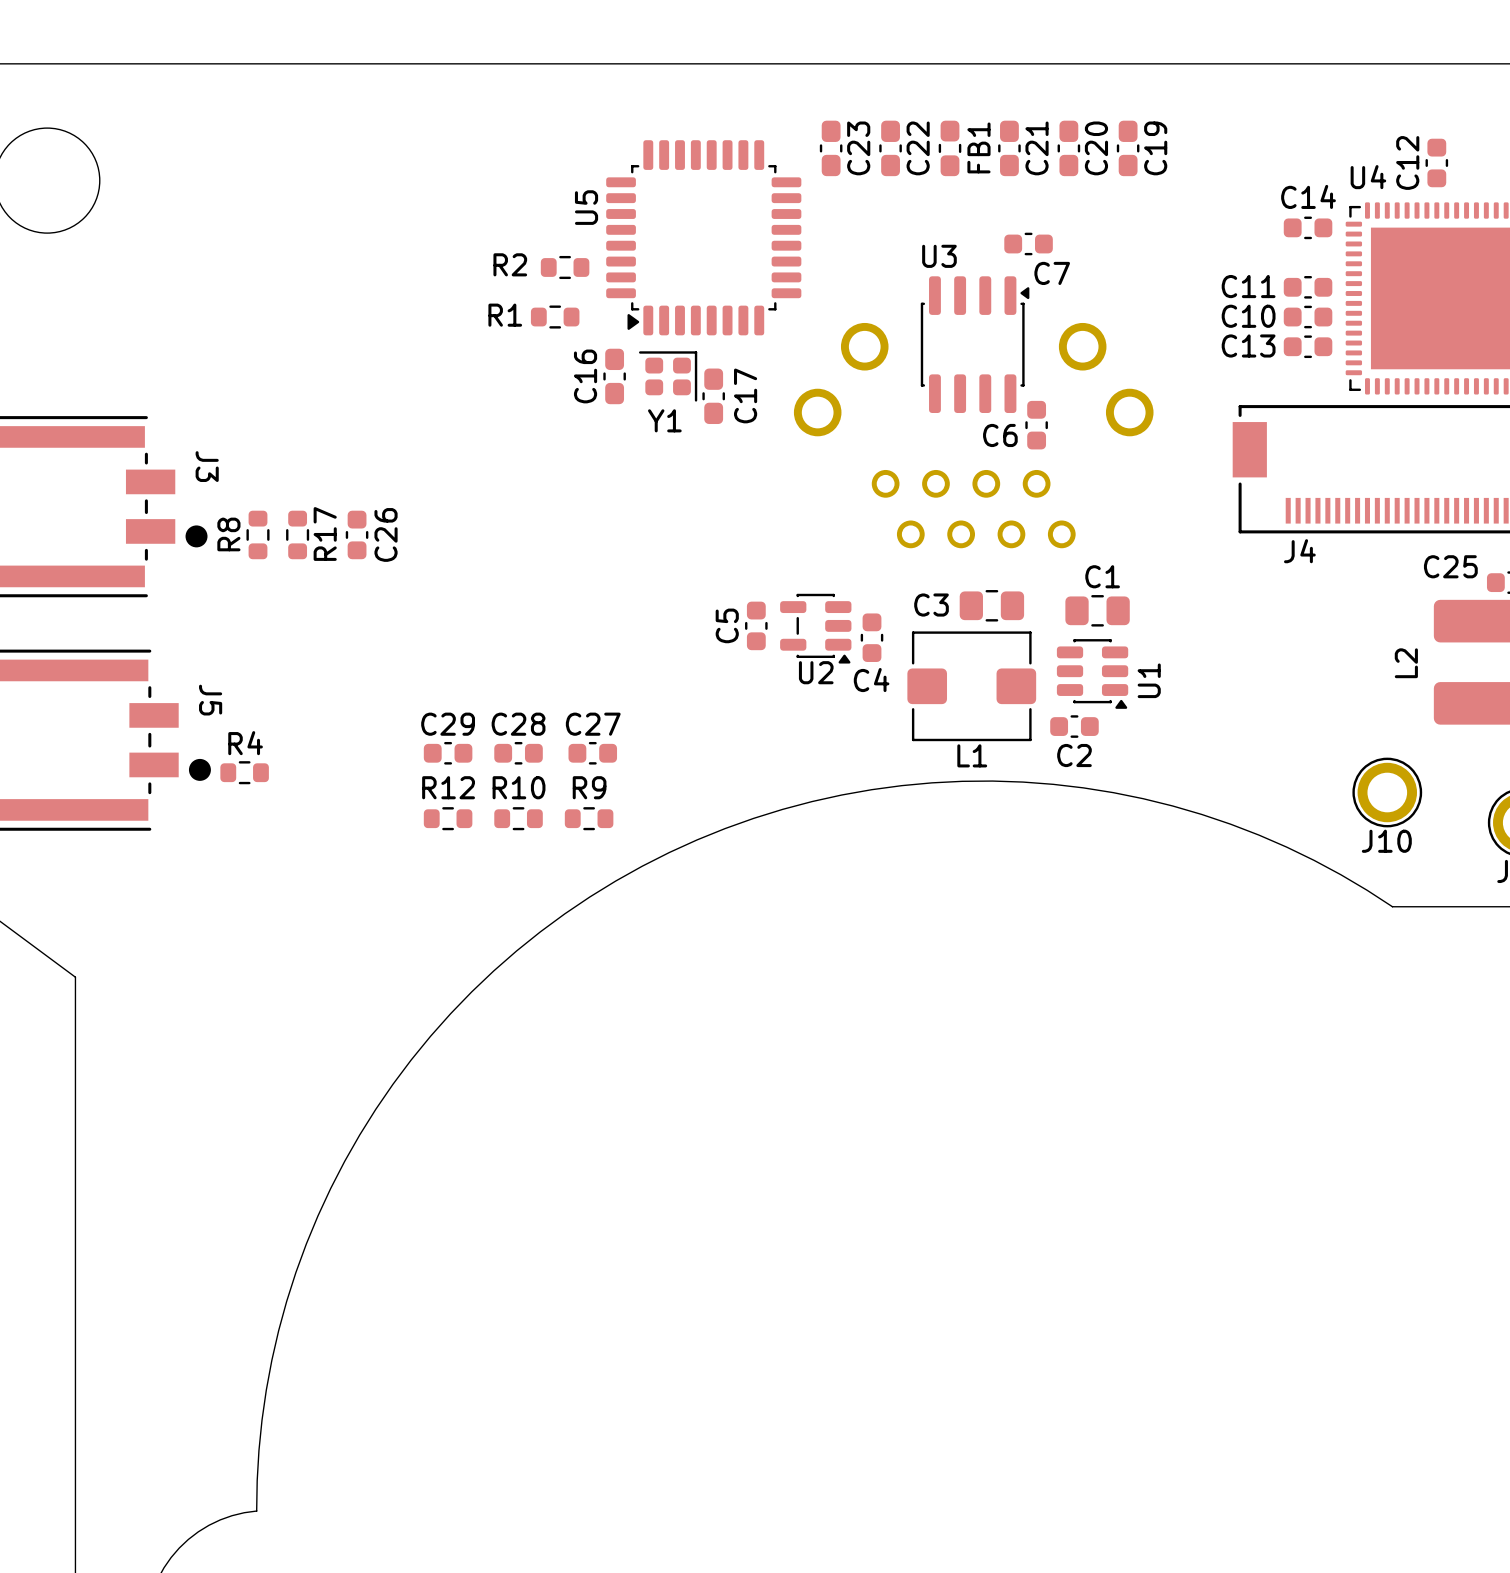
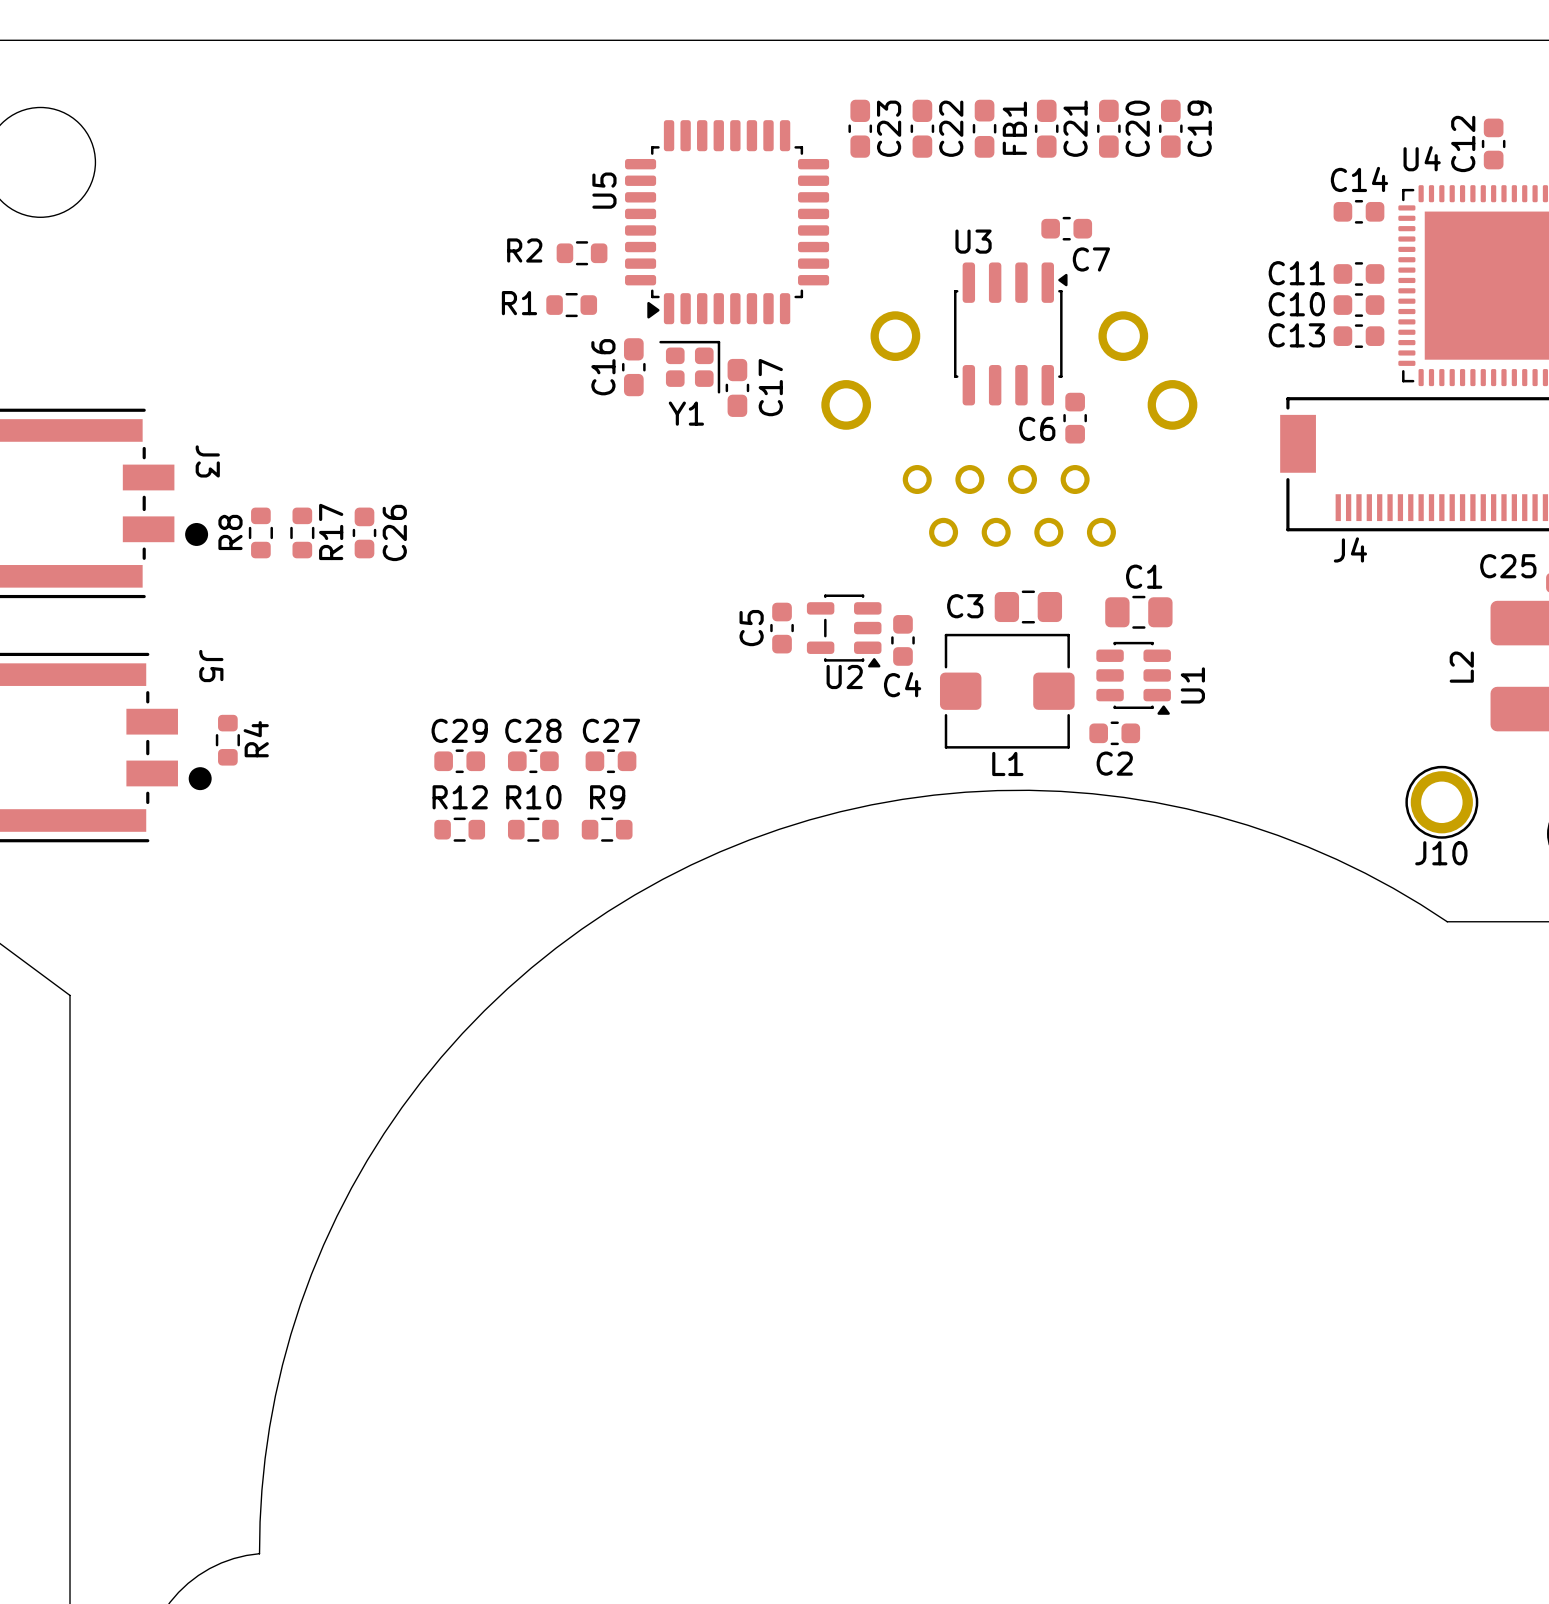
J5 name position: J5 (210, 700) -> J5 (211, 666)
R4 rotation: 0° (244, 772) -> 90° clockwise (227, 740)
R4 position: (244, 772) -> (227, 740)

